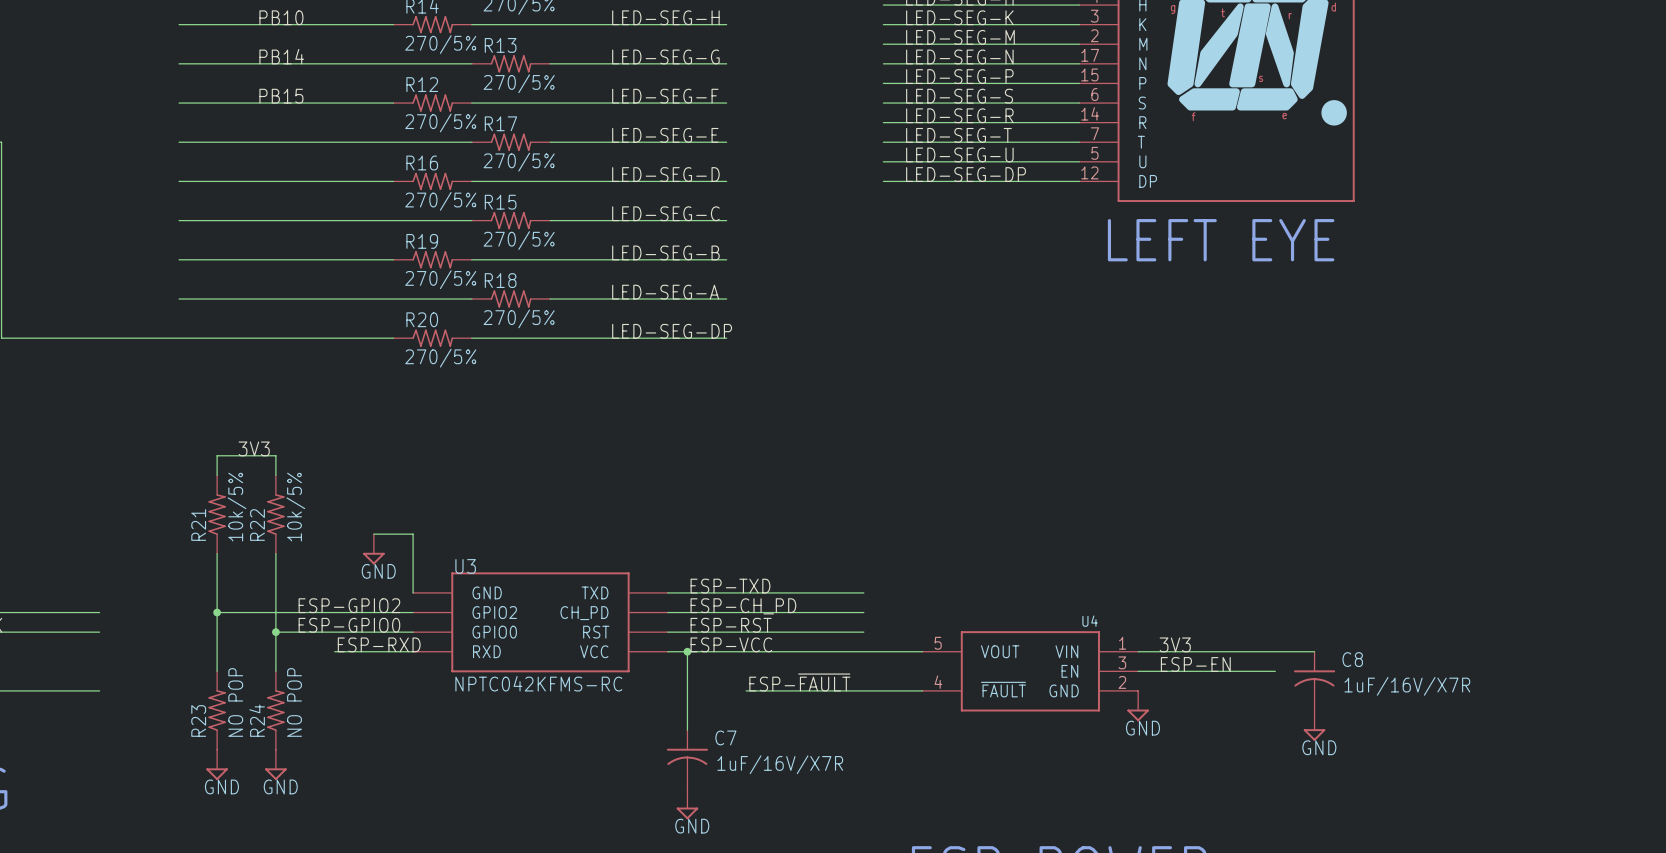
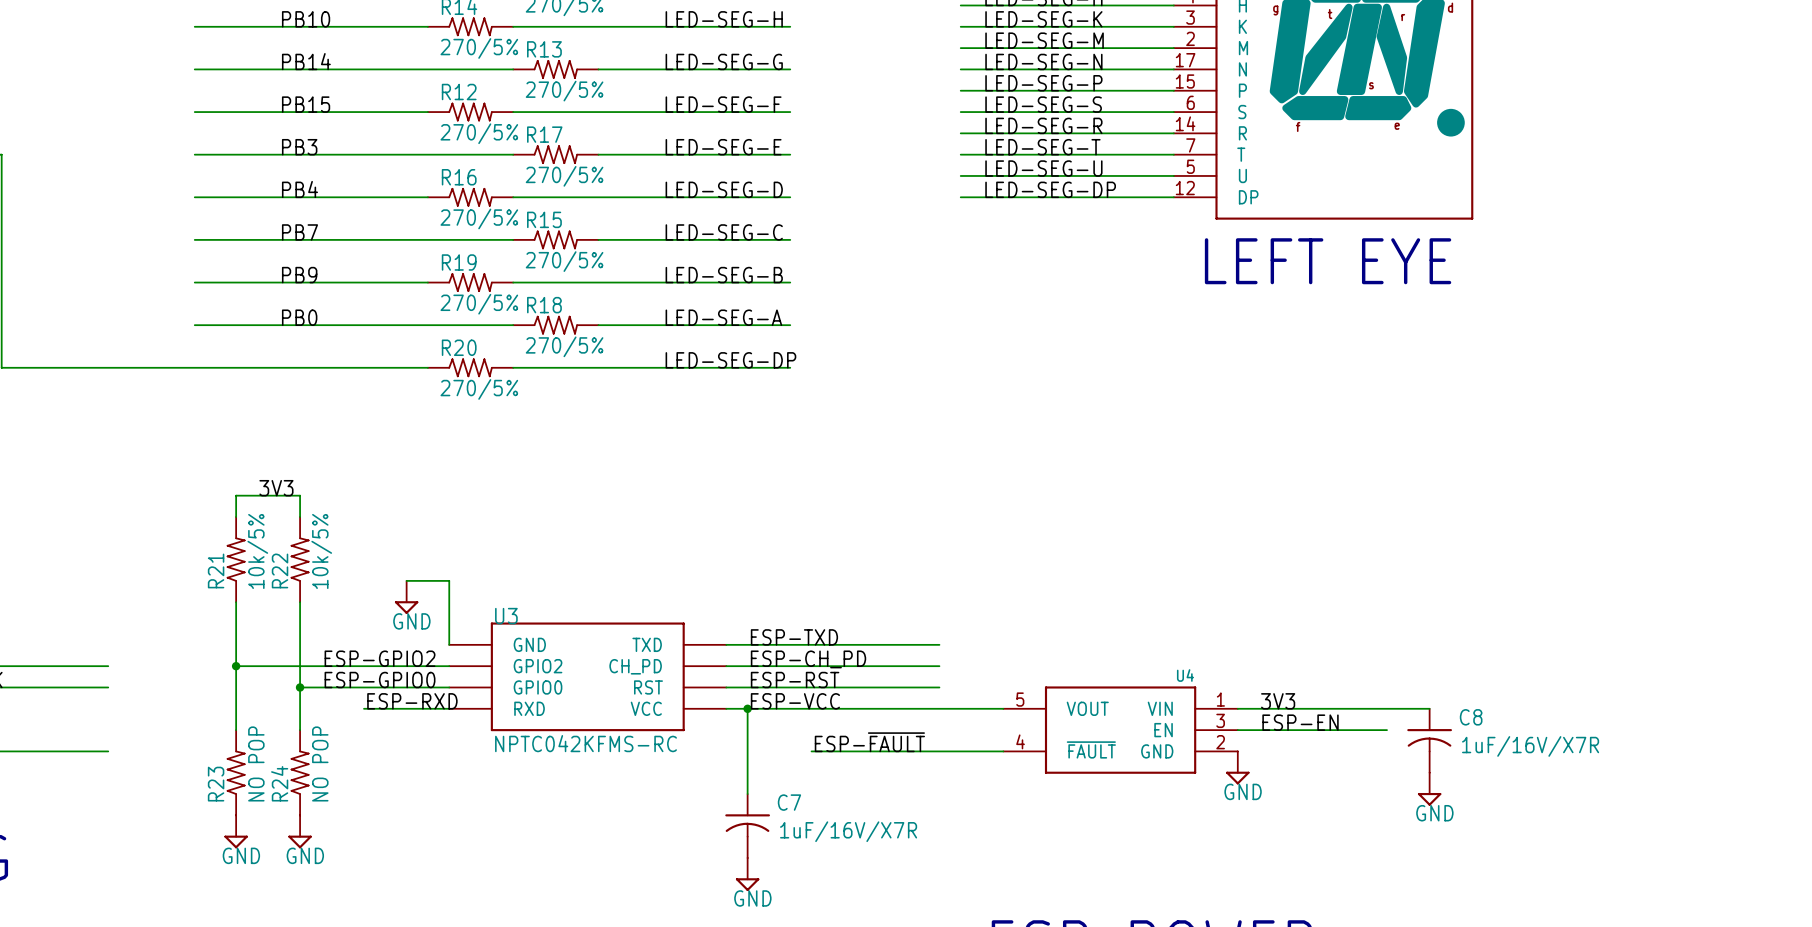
label: none -> PB3 (299, 147)
label: none -> PB4 (299, 189)
label: none -> PB7 (299, 232)
label: none -> PB9 (299, 275)
label: none -> PB0 (299, 317)

